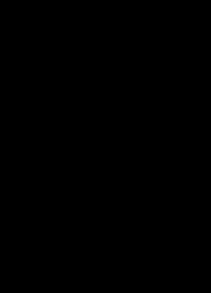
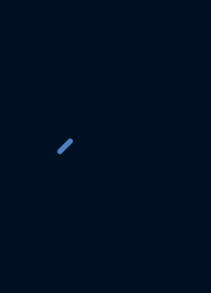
bottom track: none -> (70, 141) (59, 151)

